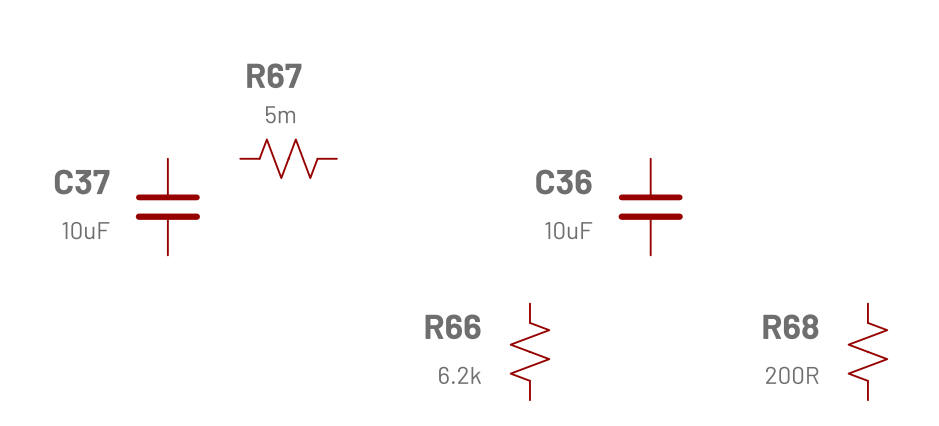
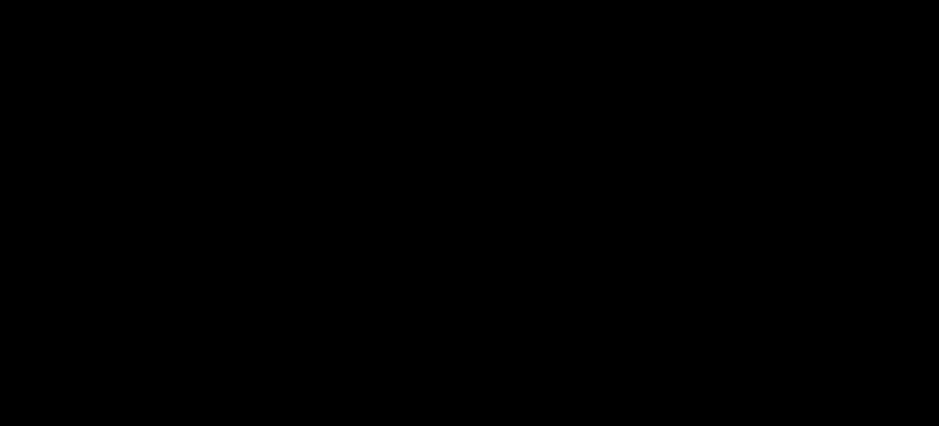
R67: 5m (288, 158) -> none
C37: 10uF (167, 207) -> none
C36: 10uF (650, 207) -> none
R66: 6.2k (529, 351) -> none
R68: 200R (867, 351) -> none

